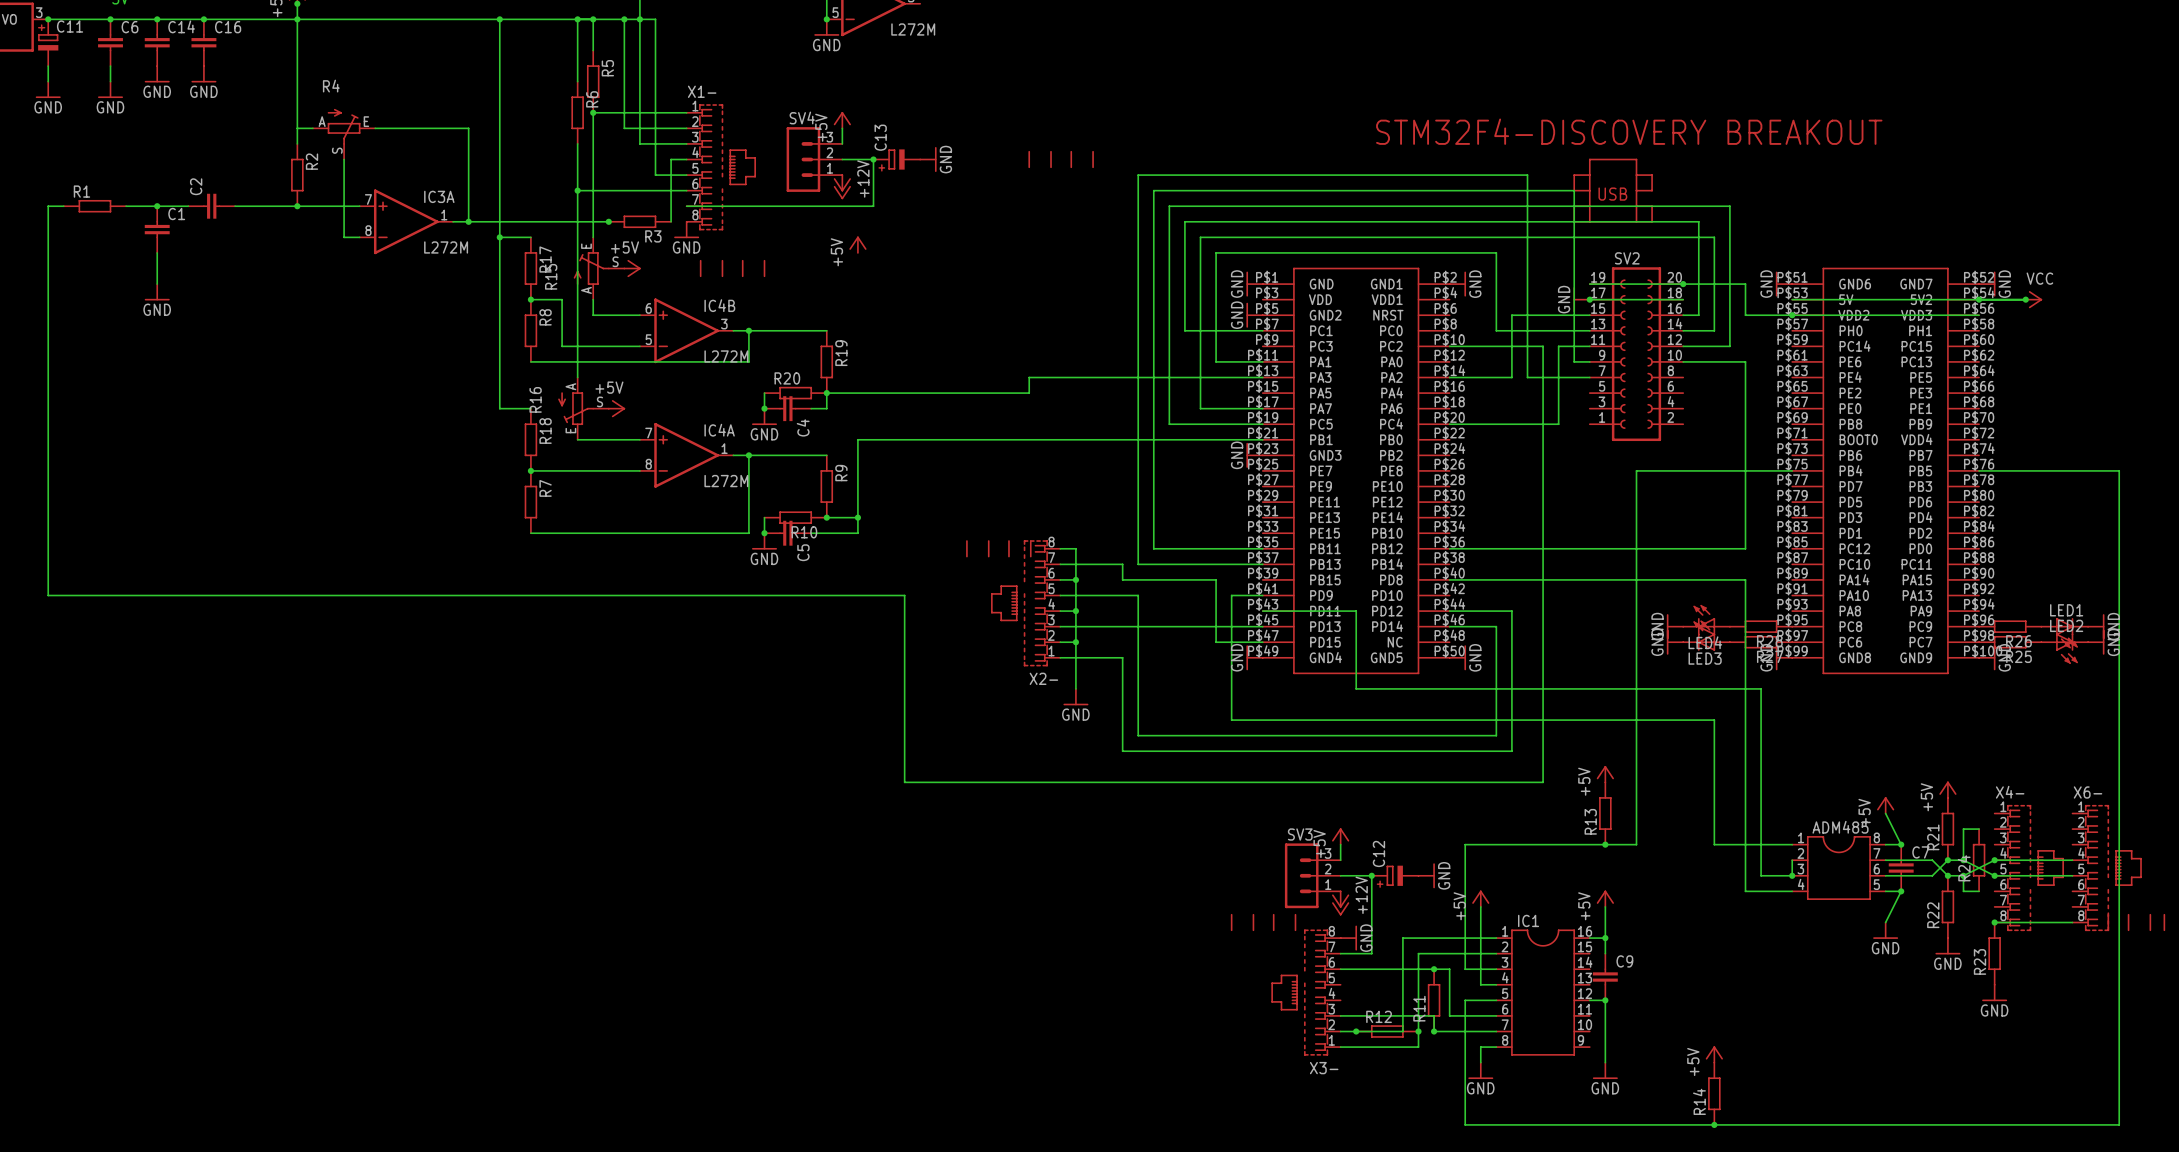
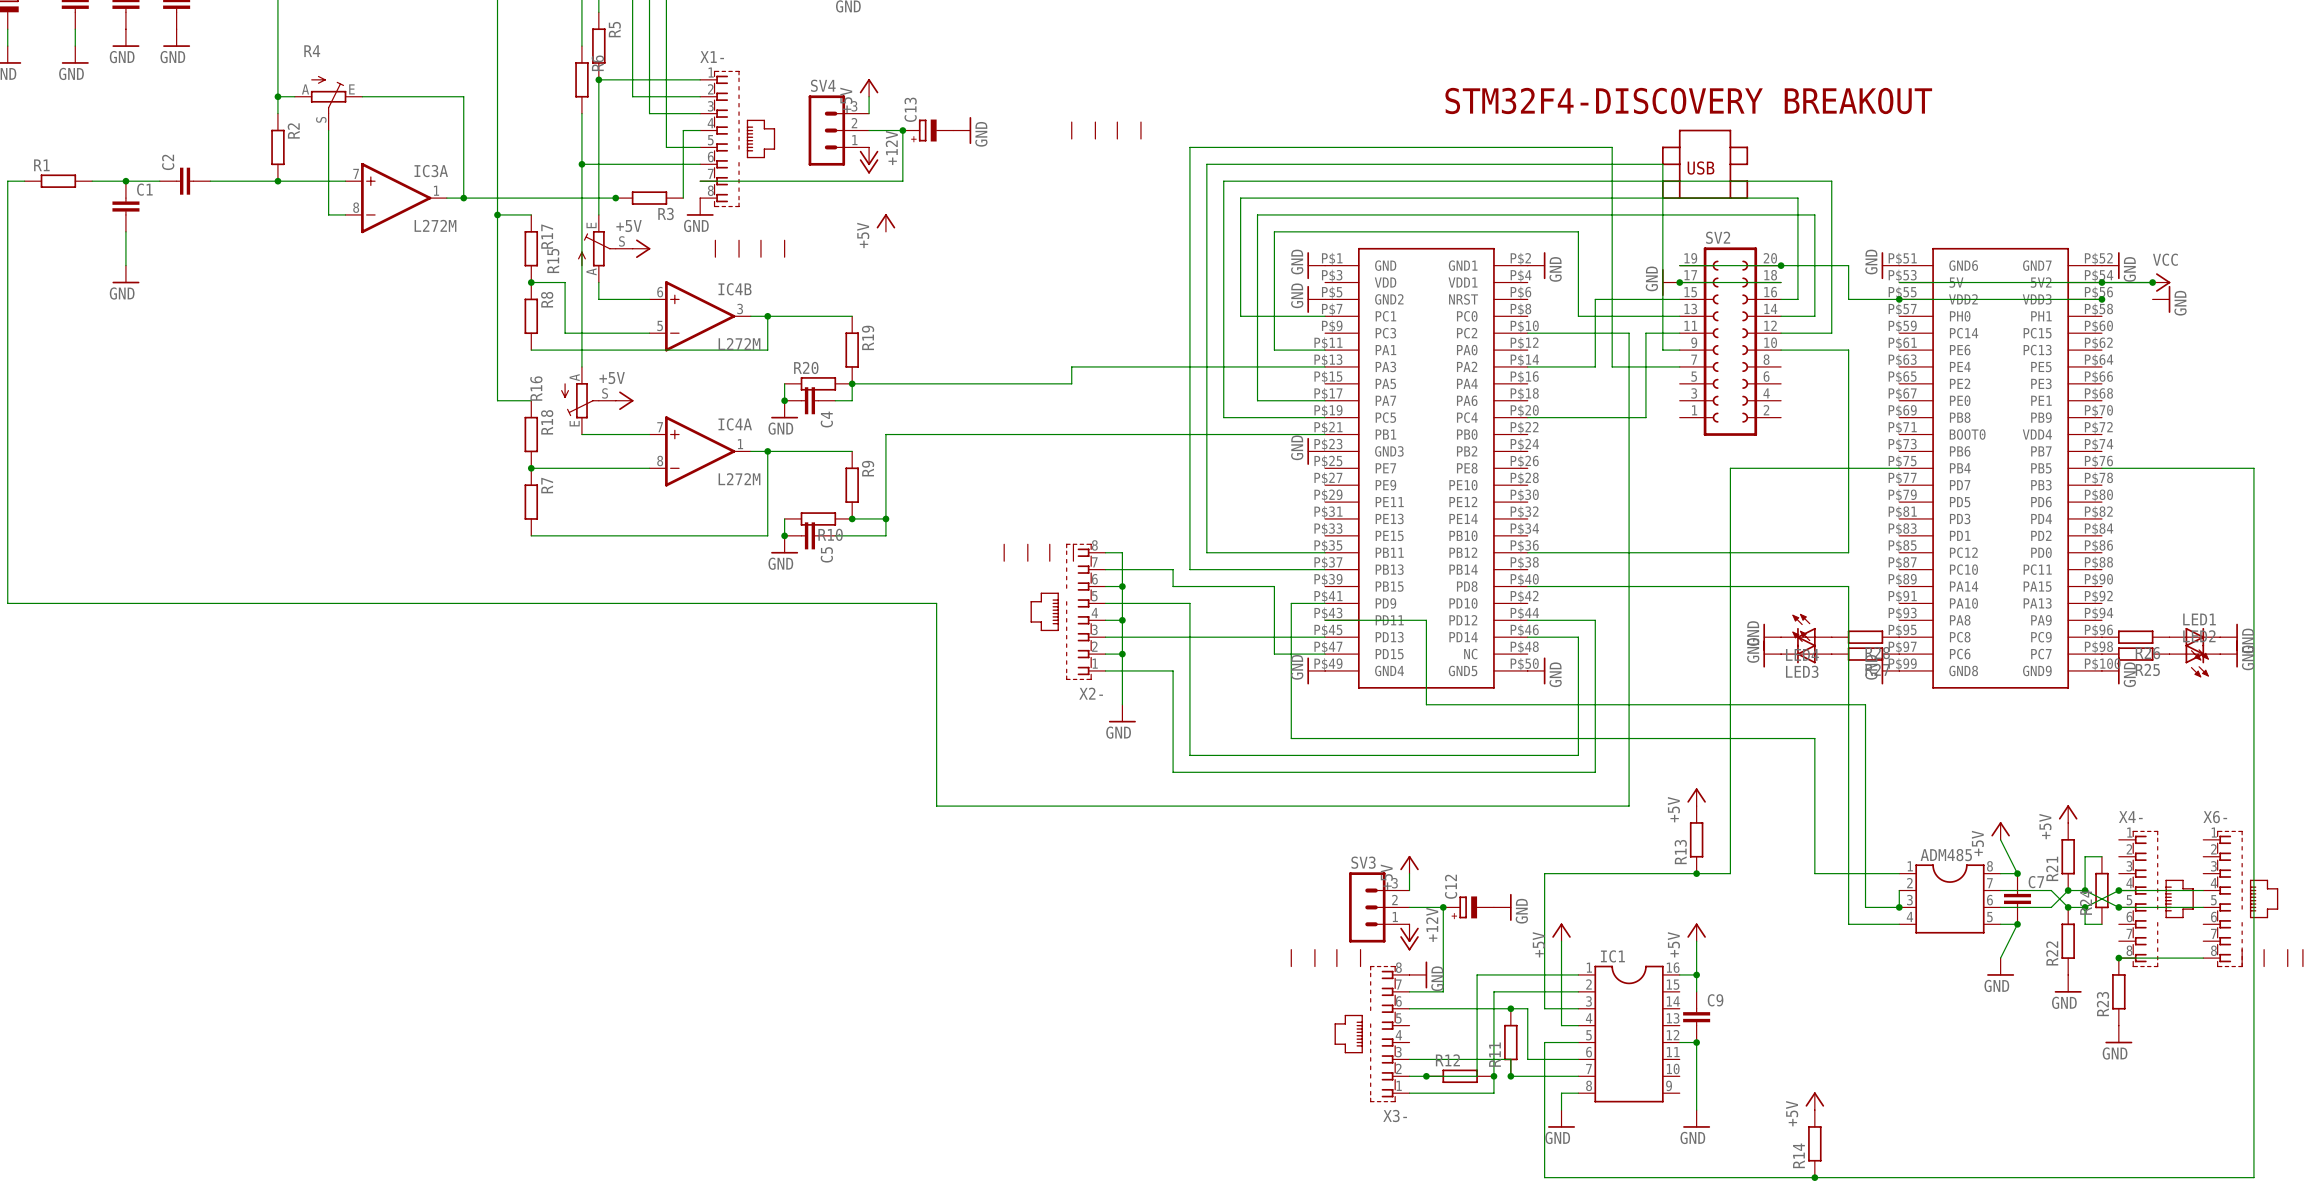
junction: none -> (277, 96)
junction: none -> (2101, 299)
power symbol: none -> GND (2161, 299)

